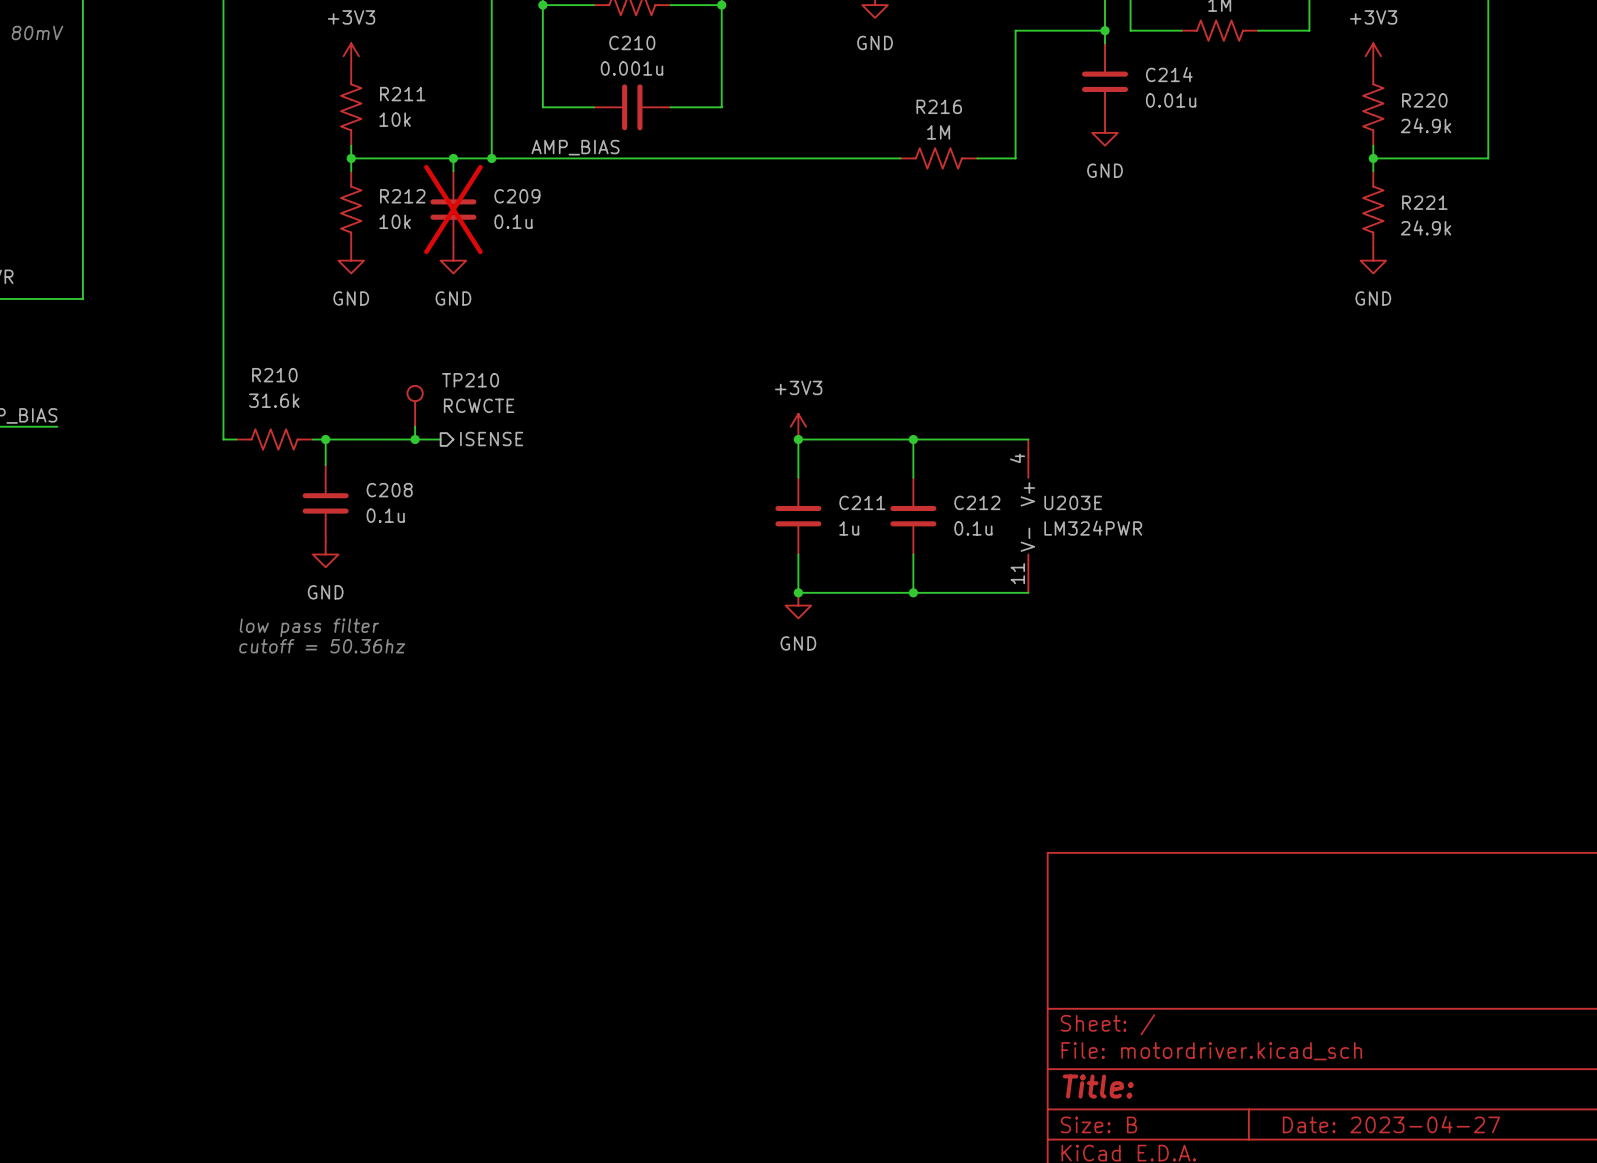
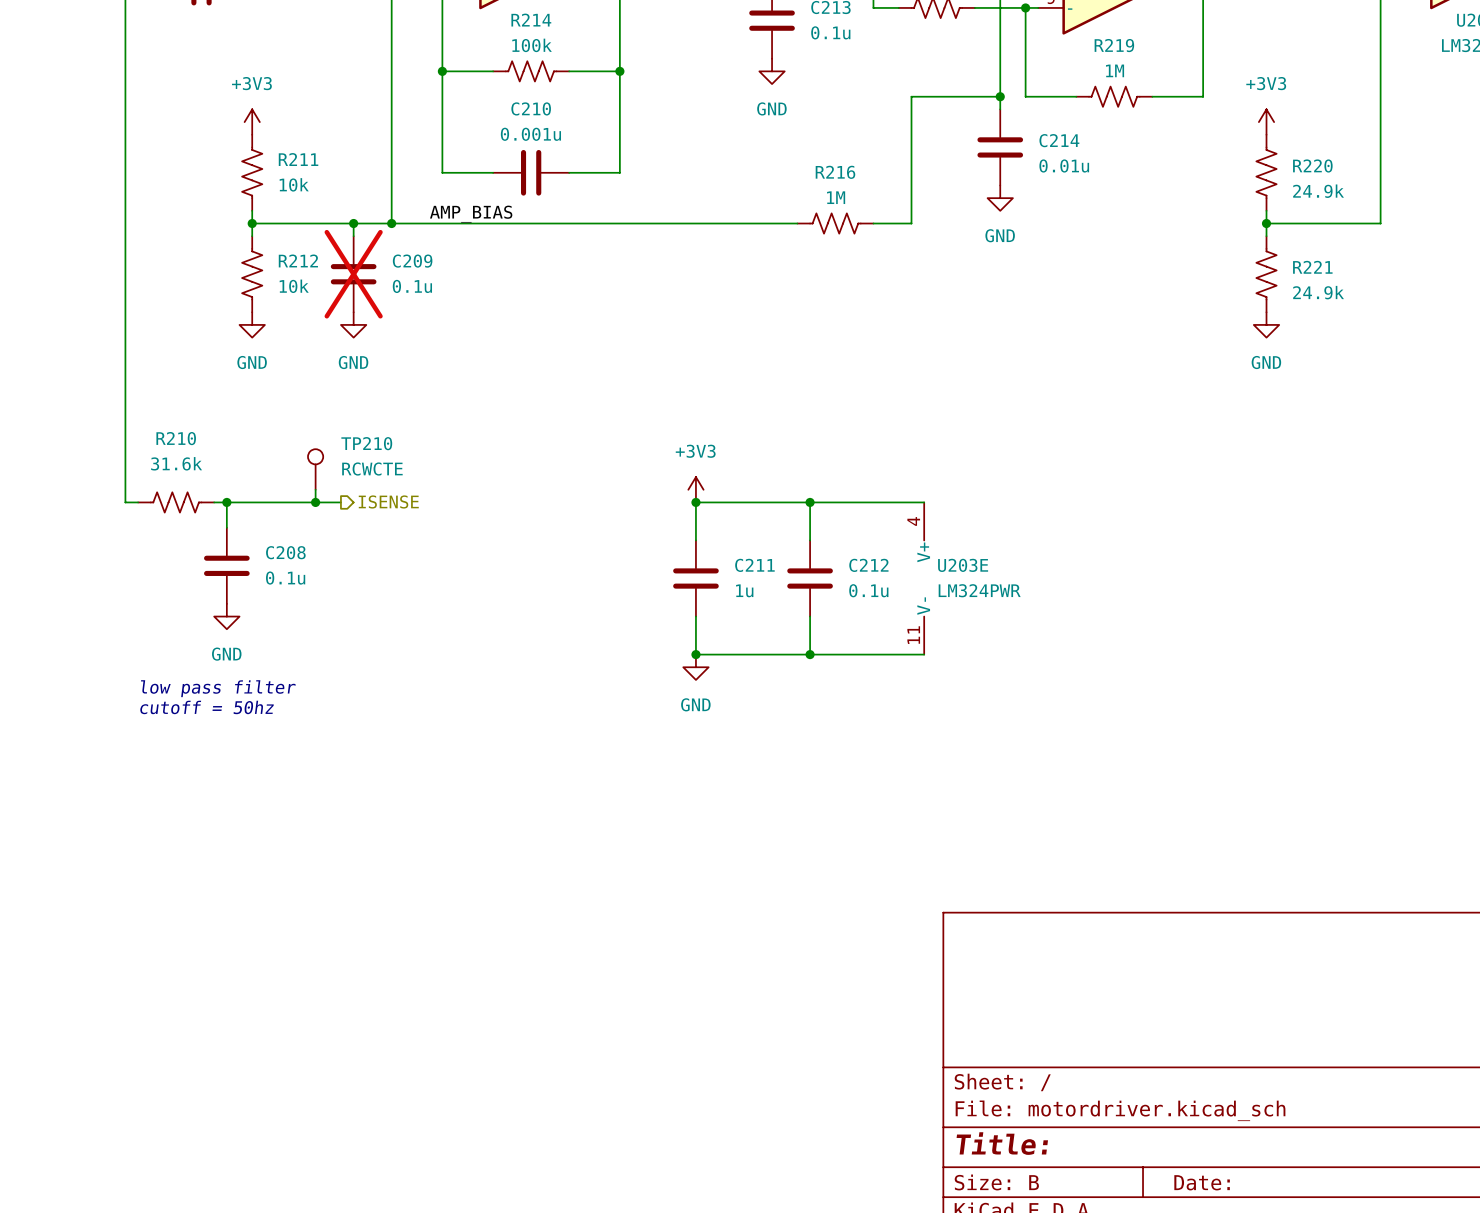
text: cutoff = 50.36hz (322, 646) -> cutoff = 50hz (206, 707)
title block: Date: 2023-04-27 (1391, 1124) -> Date: (1202, 1182)

